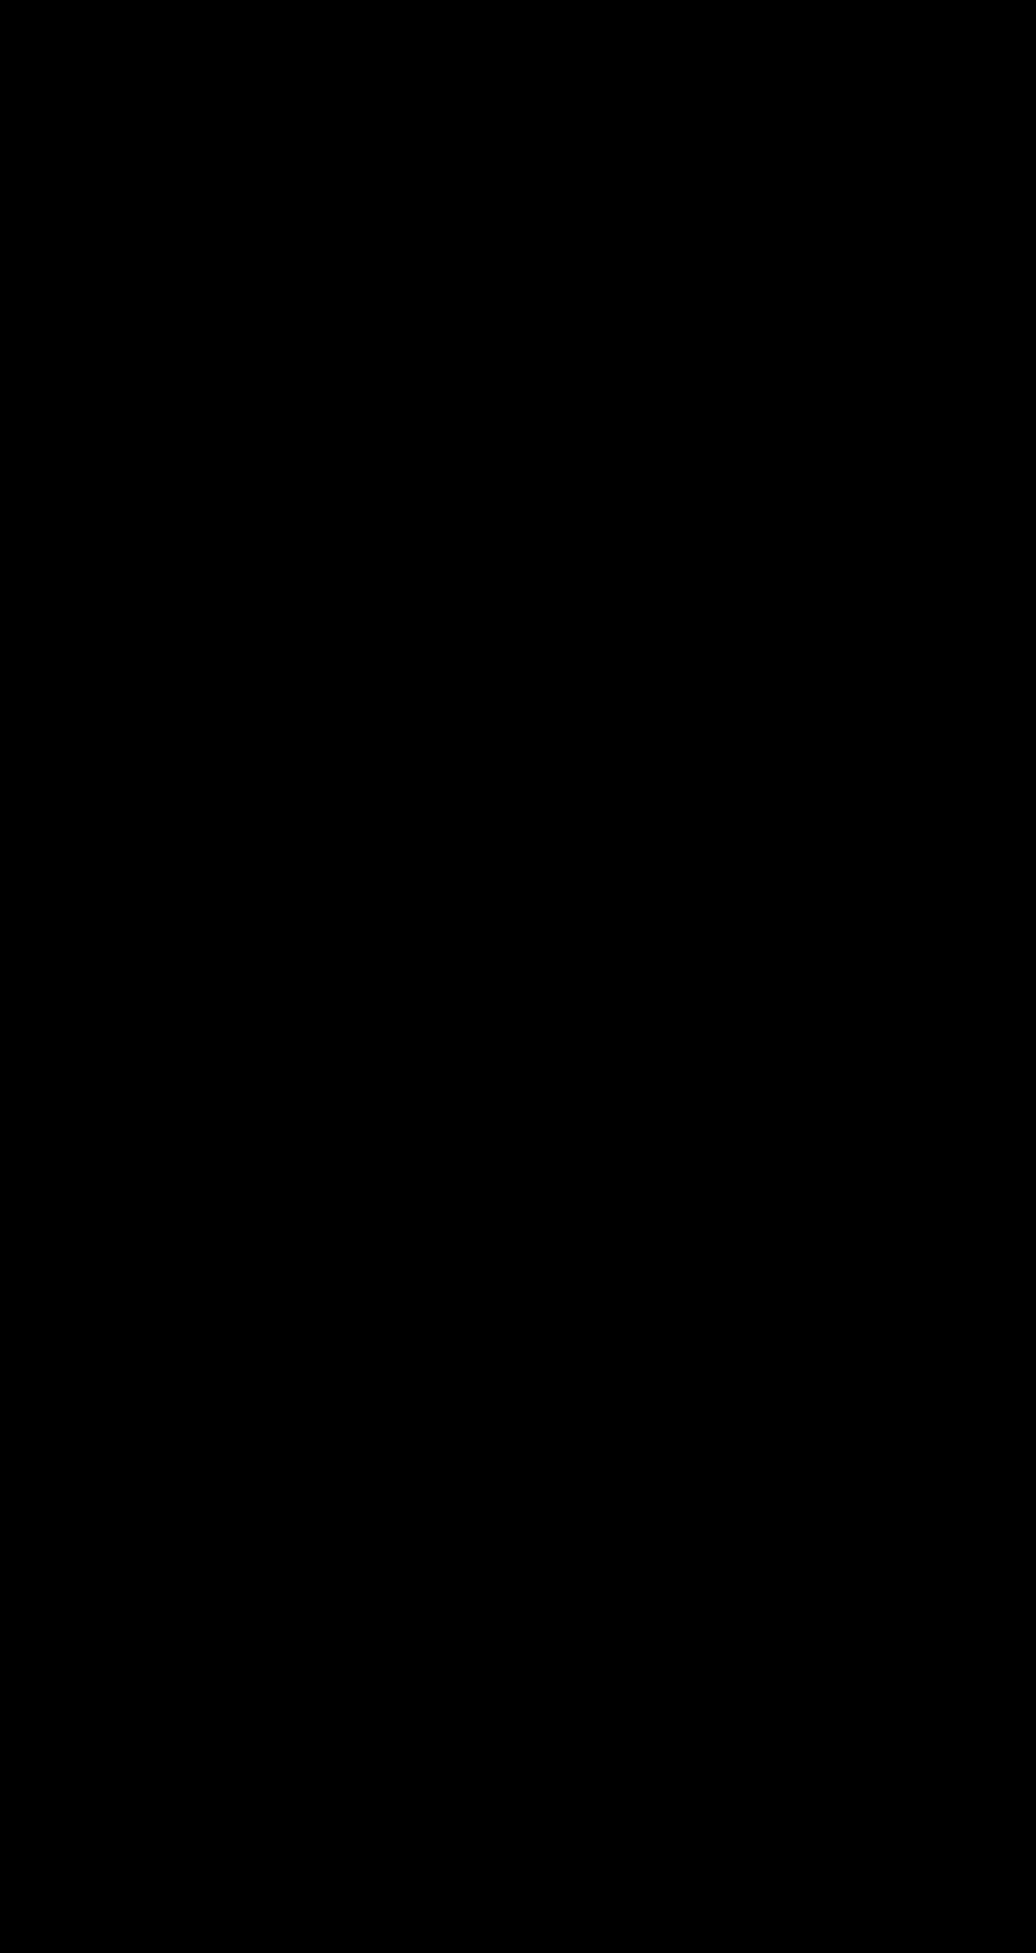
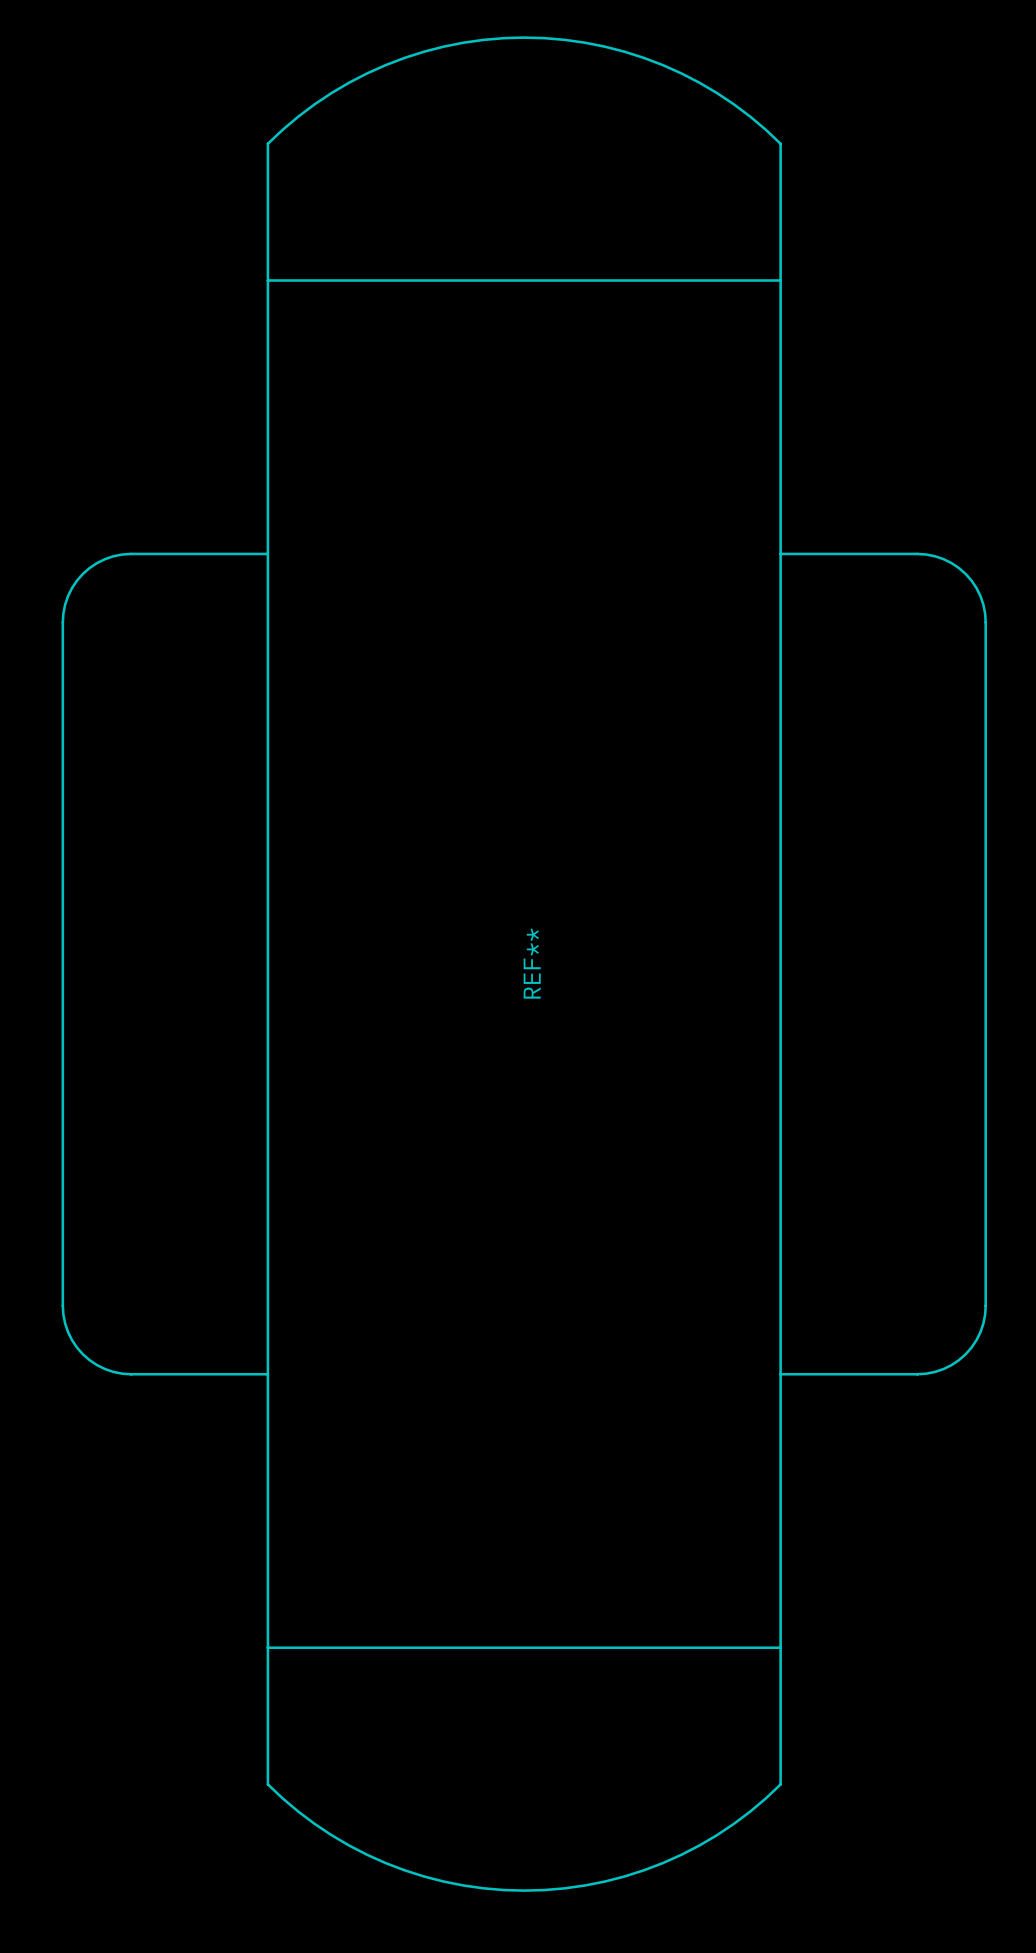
REF**: none -> (524, 964)

